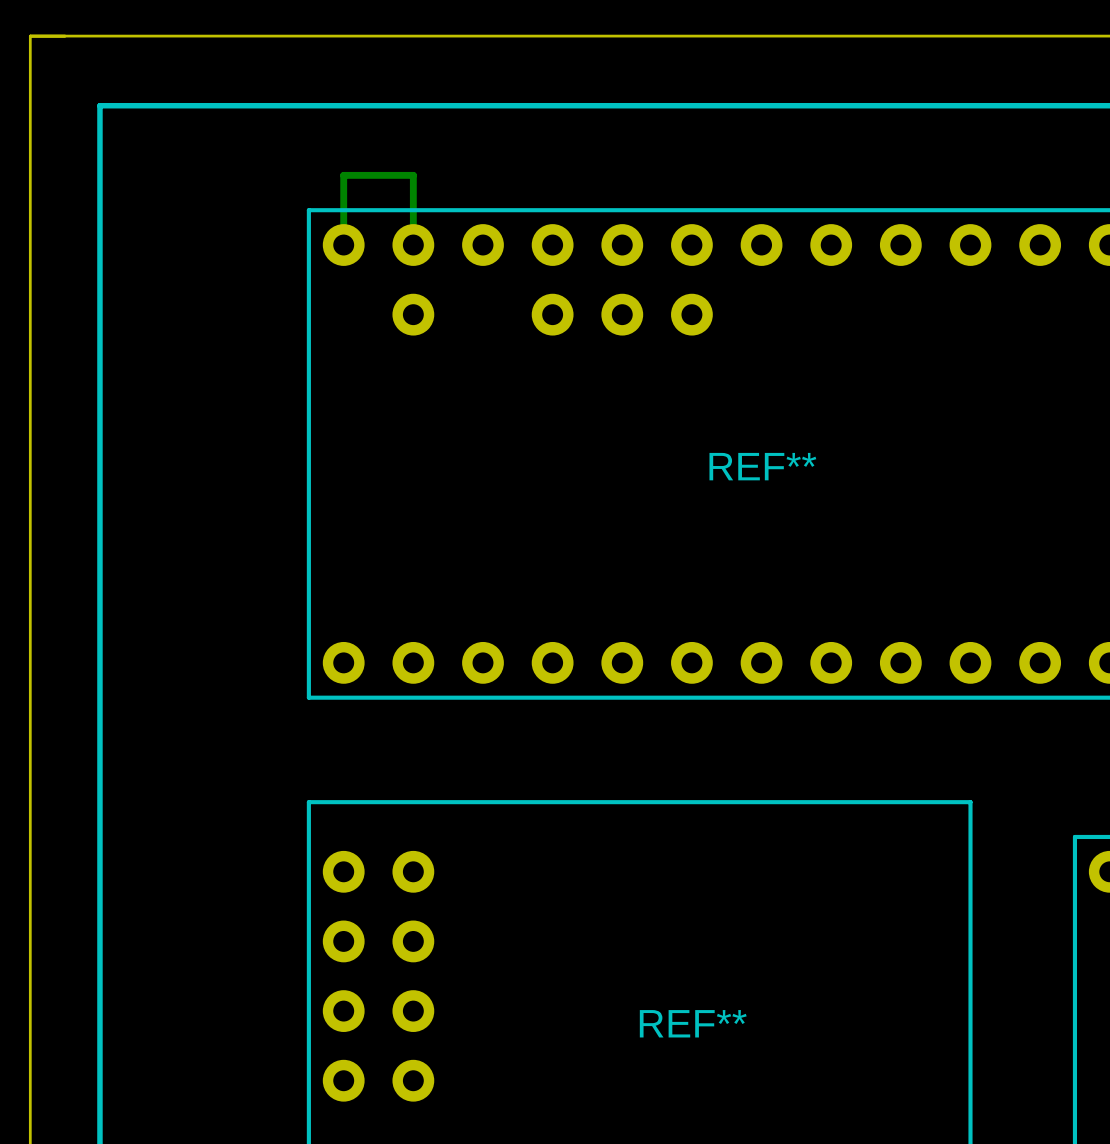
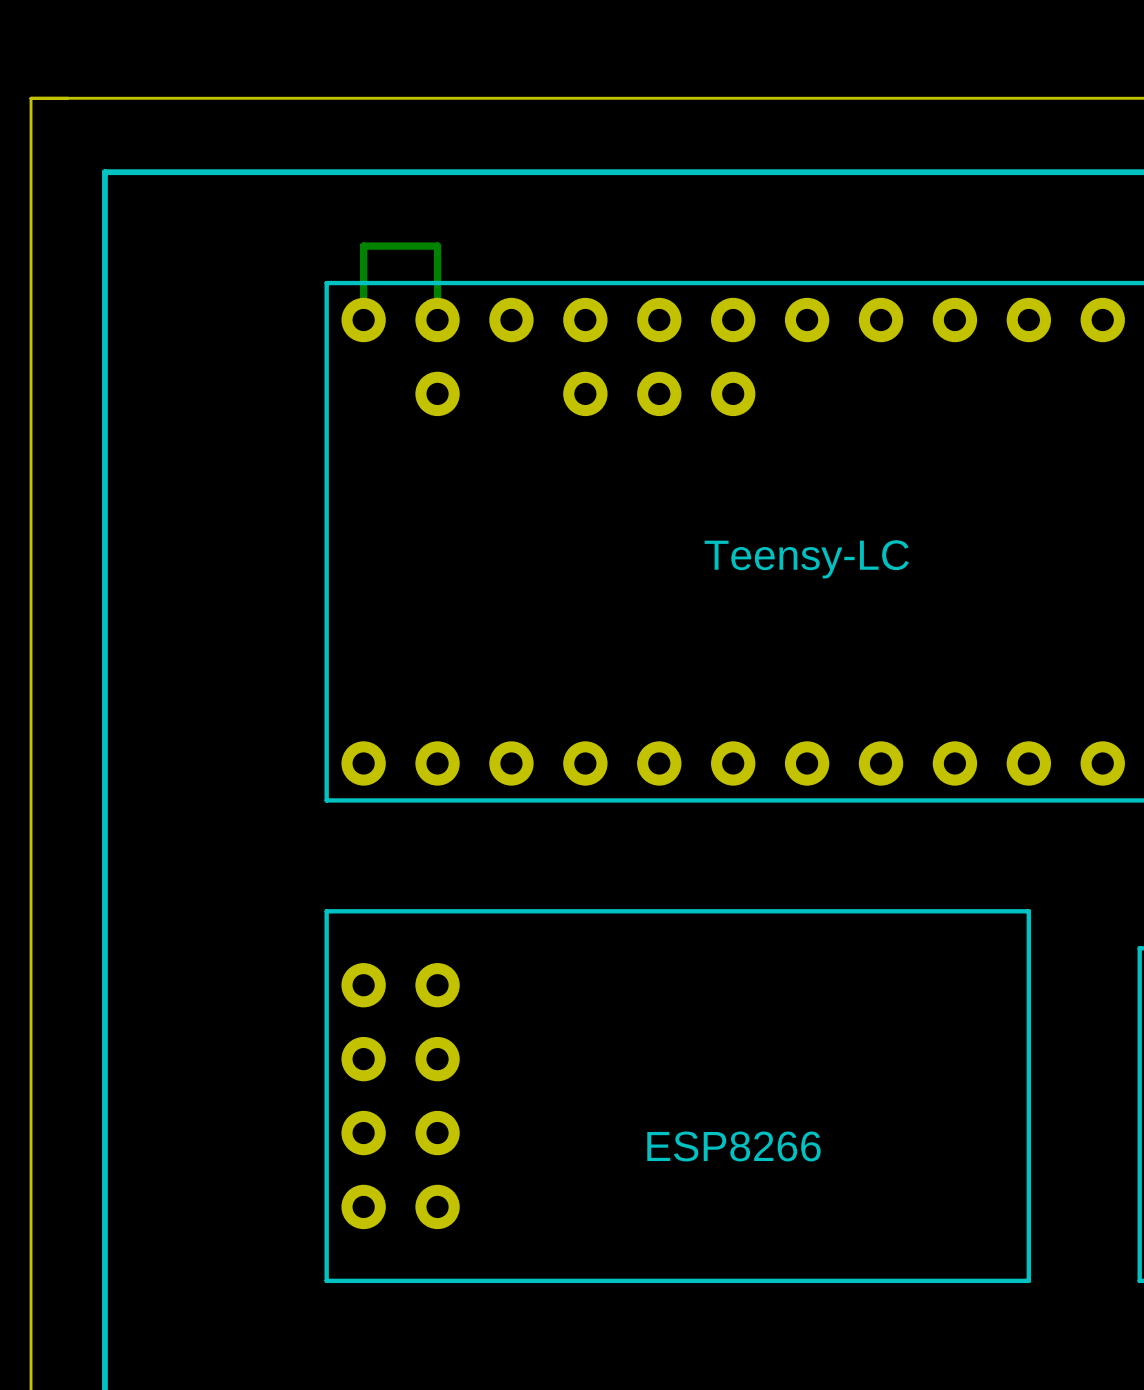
REF** name: REF** (762, 466) -> Teensy-LC (806, 559)
REF** name: REF** (693, 1023) -> ESP8266 (734, 1146)

